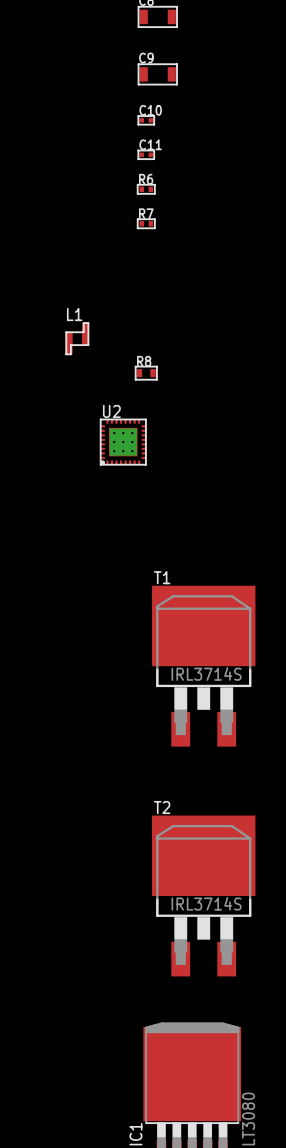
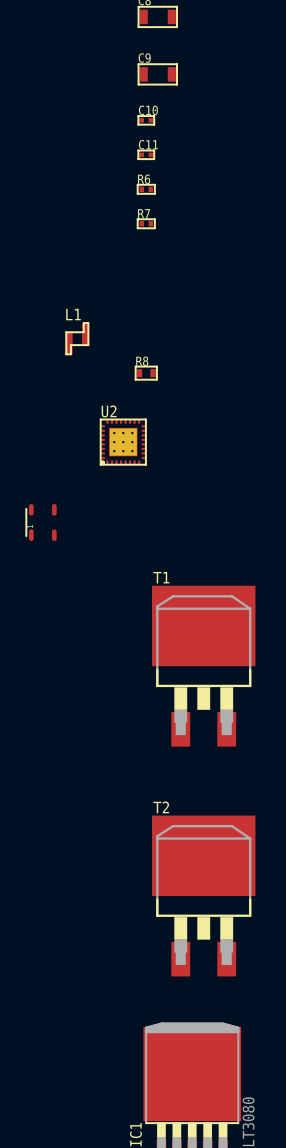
part: none -> (41, 522)
T1 value: IRL3714S (206, 673) -> none
T2 value: IRL3714S (206, 903) -> none

